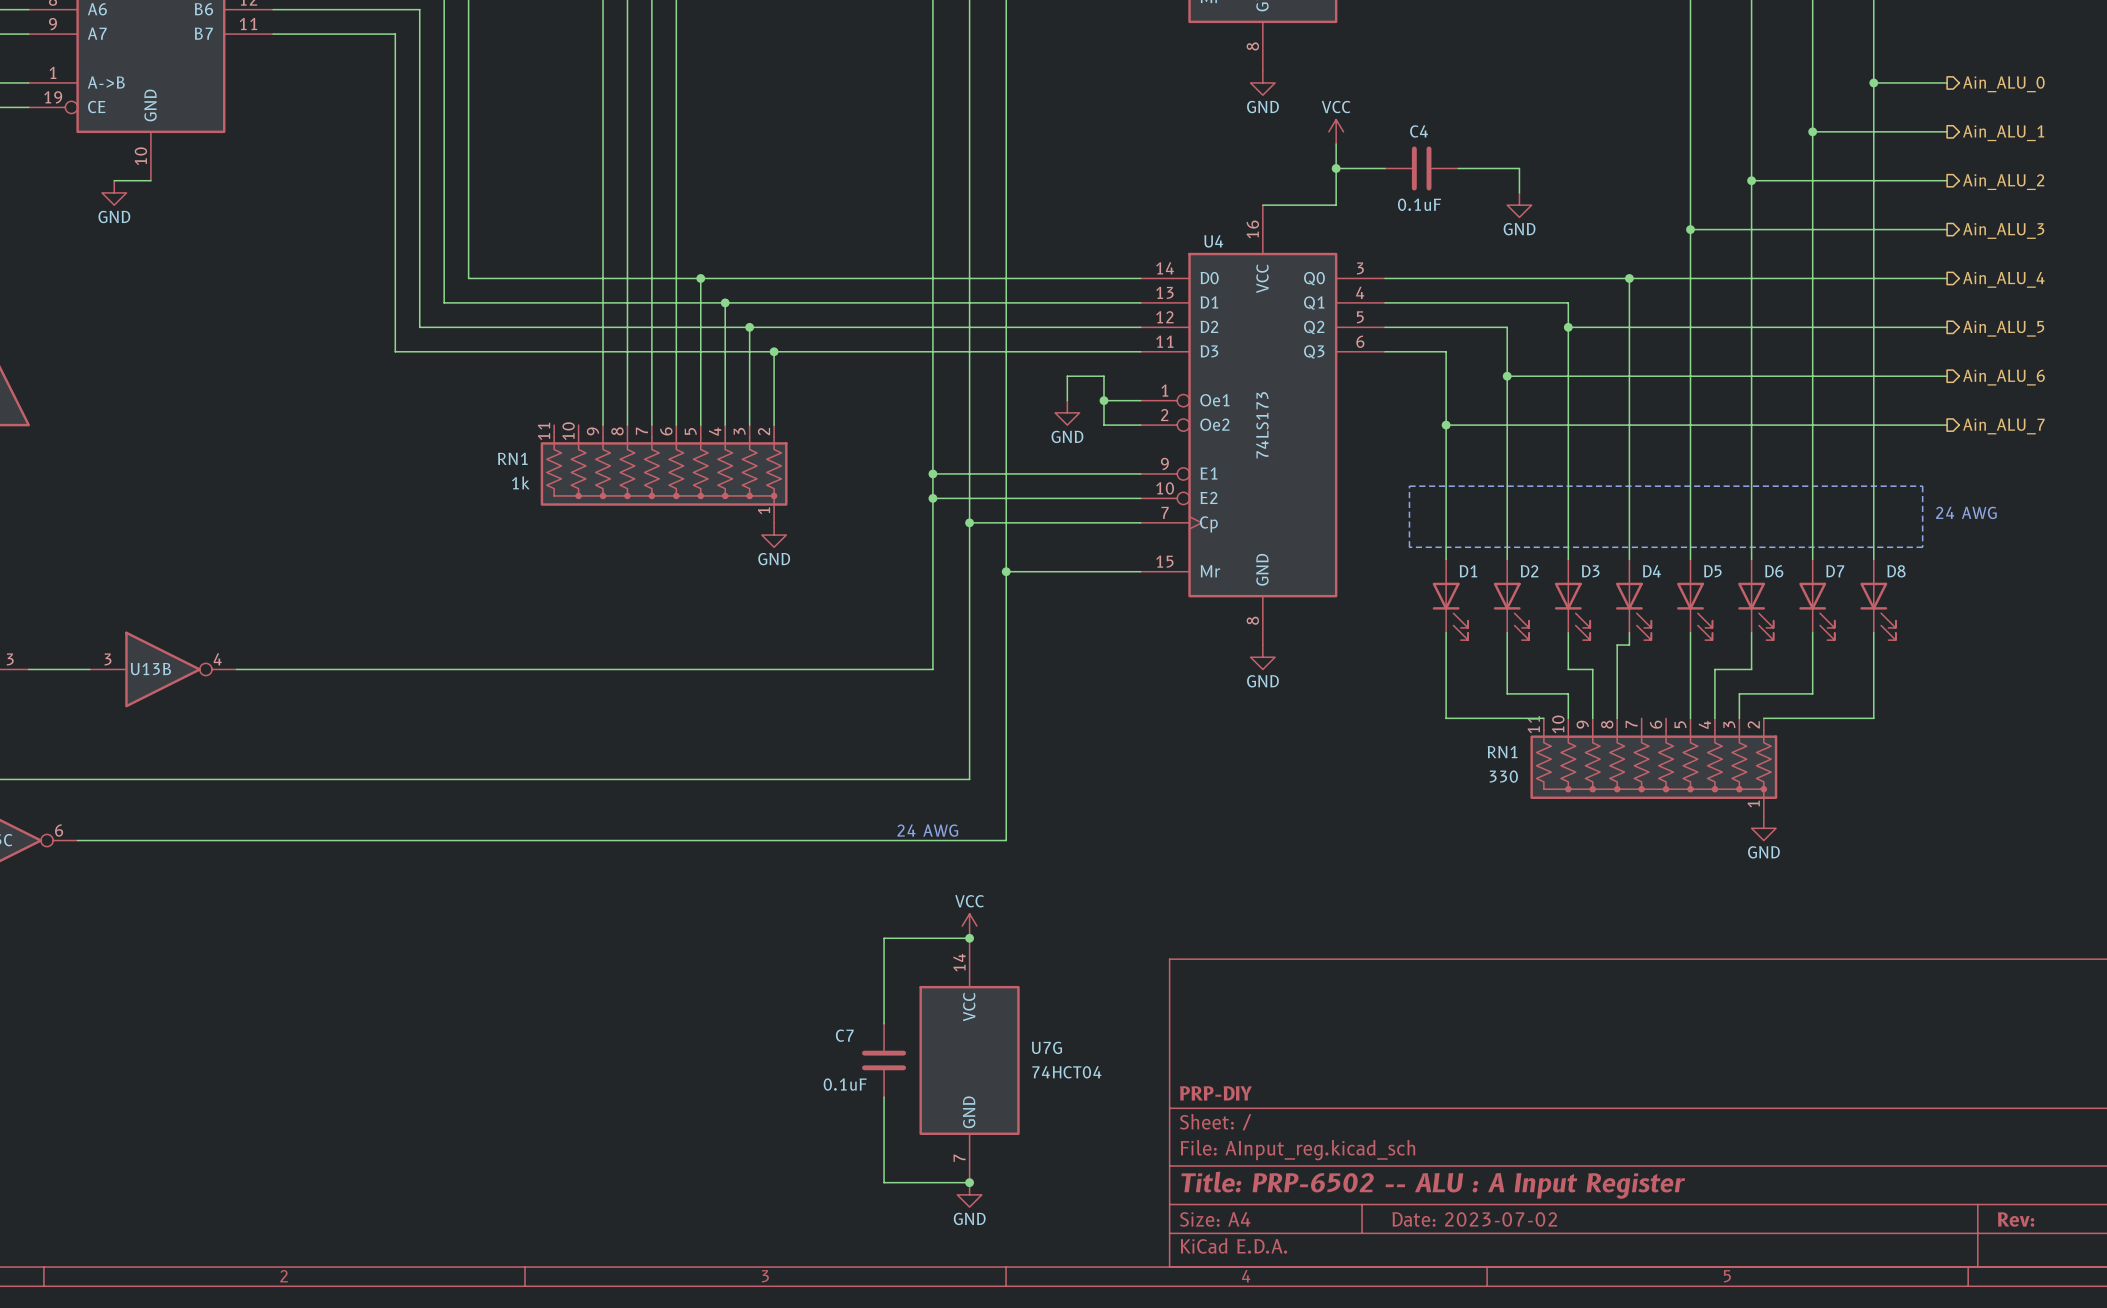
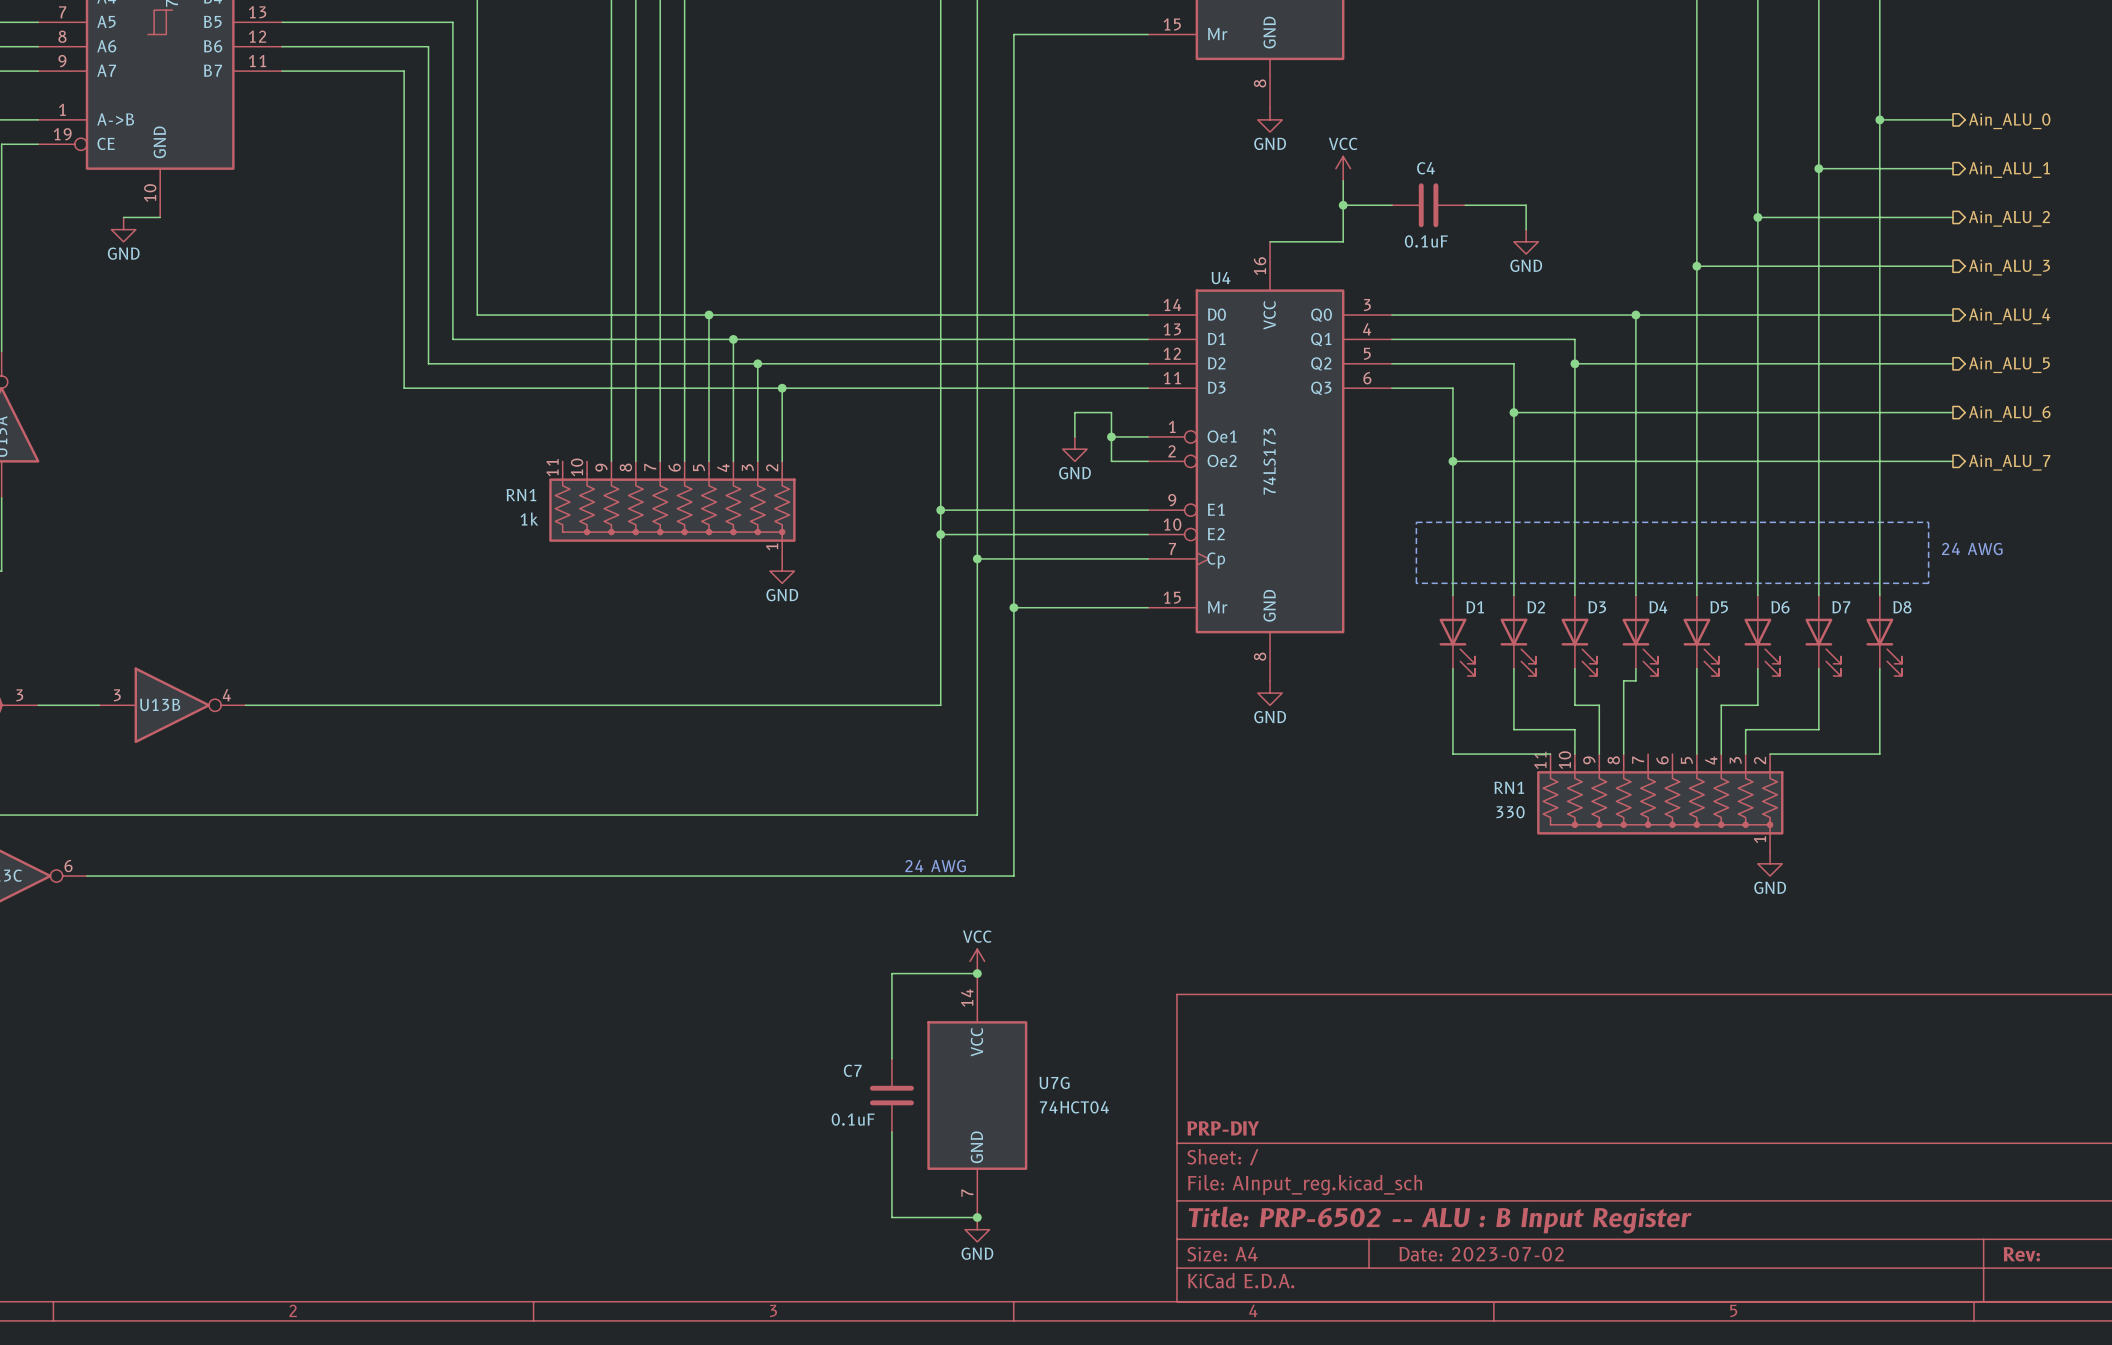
title block: Title: PRP-6502 -- ALU : A Input Register (1433, 1185) -> Title: PRP-6502 -- ALU : B Input Register (1440, 1220)

